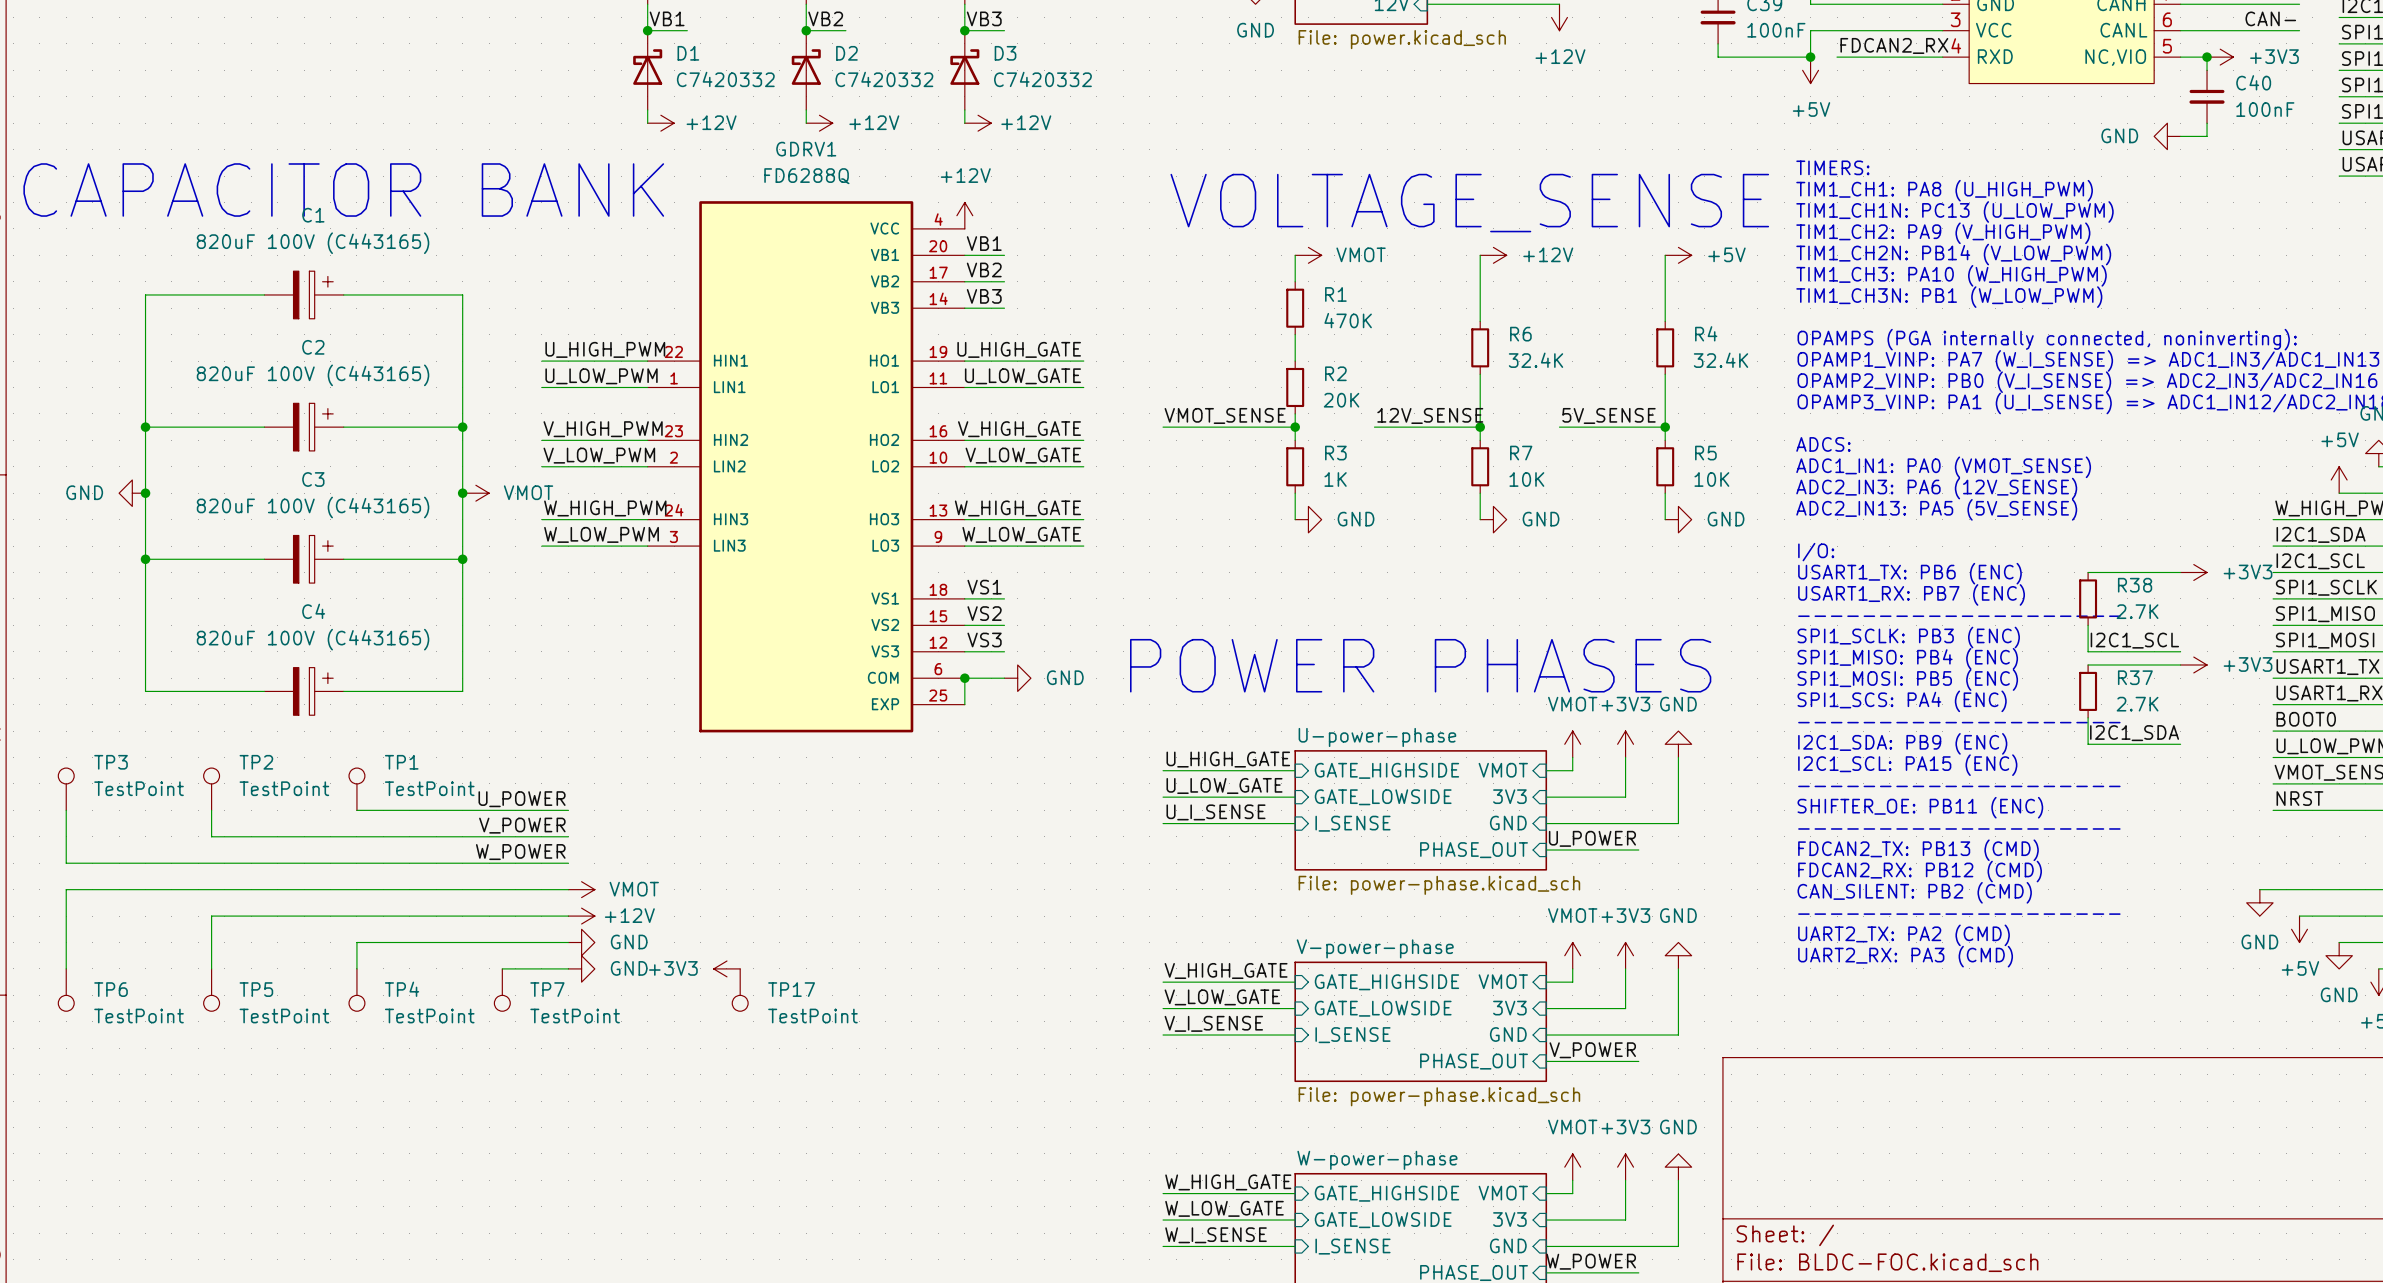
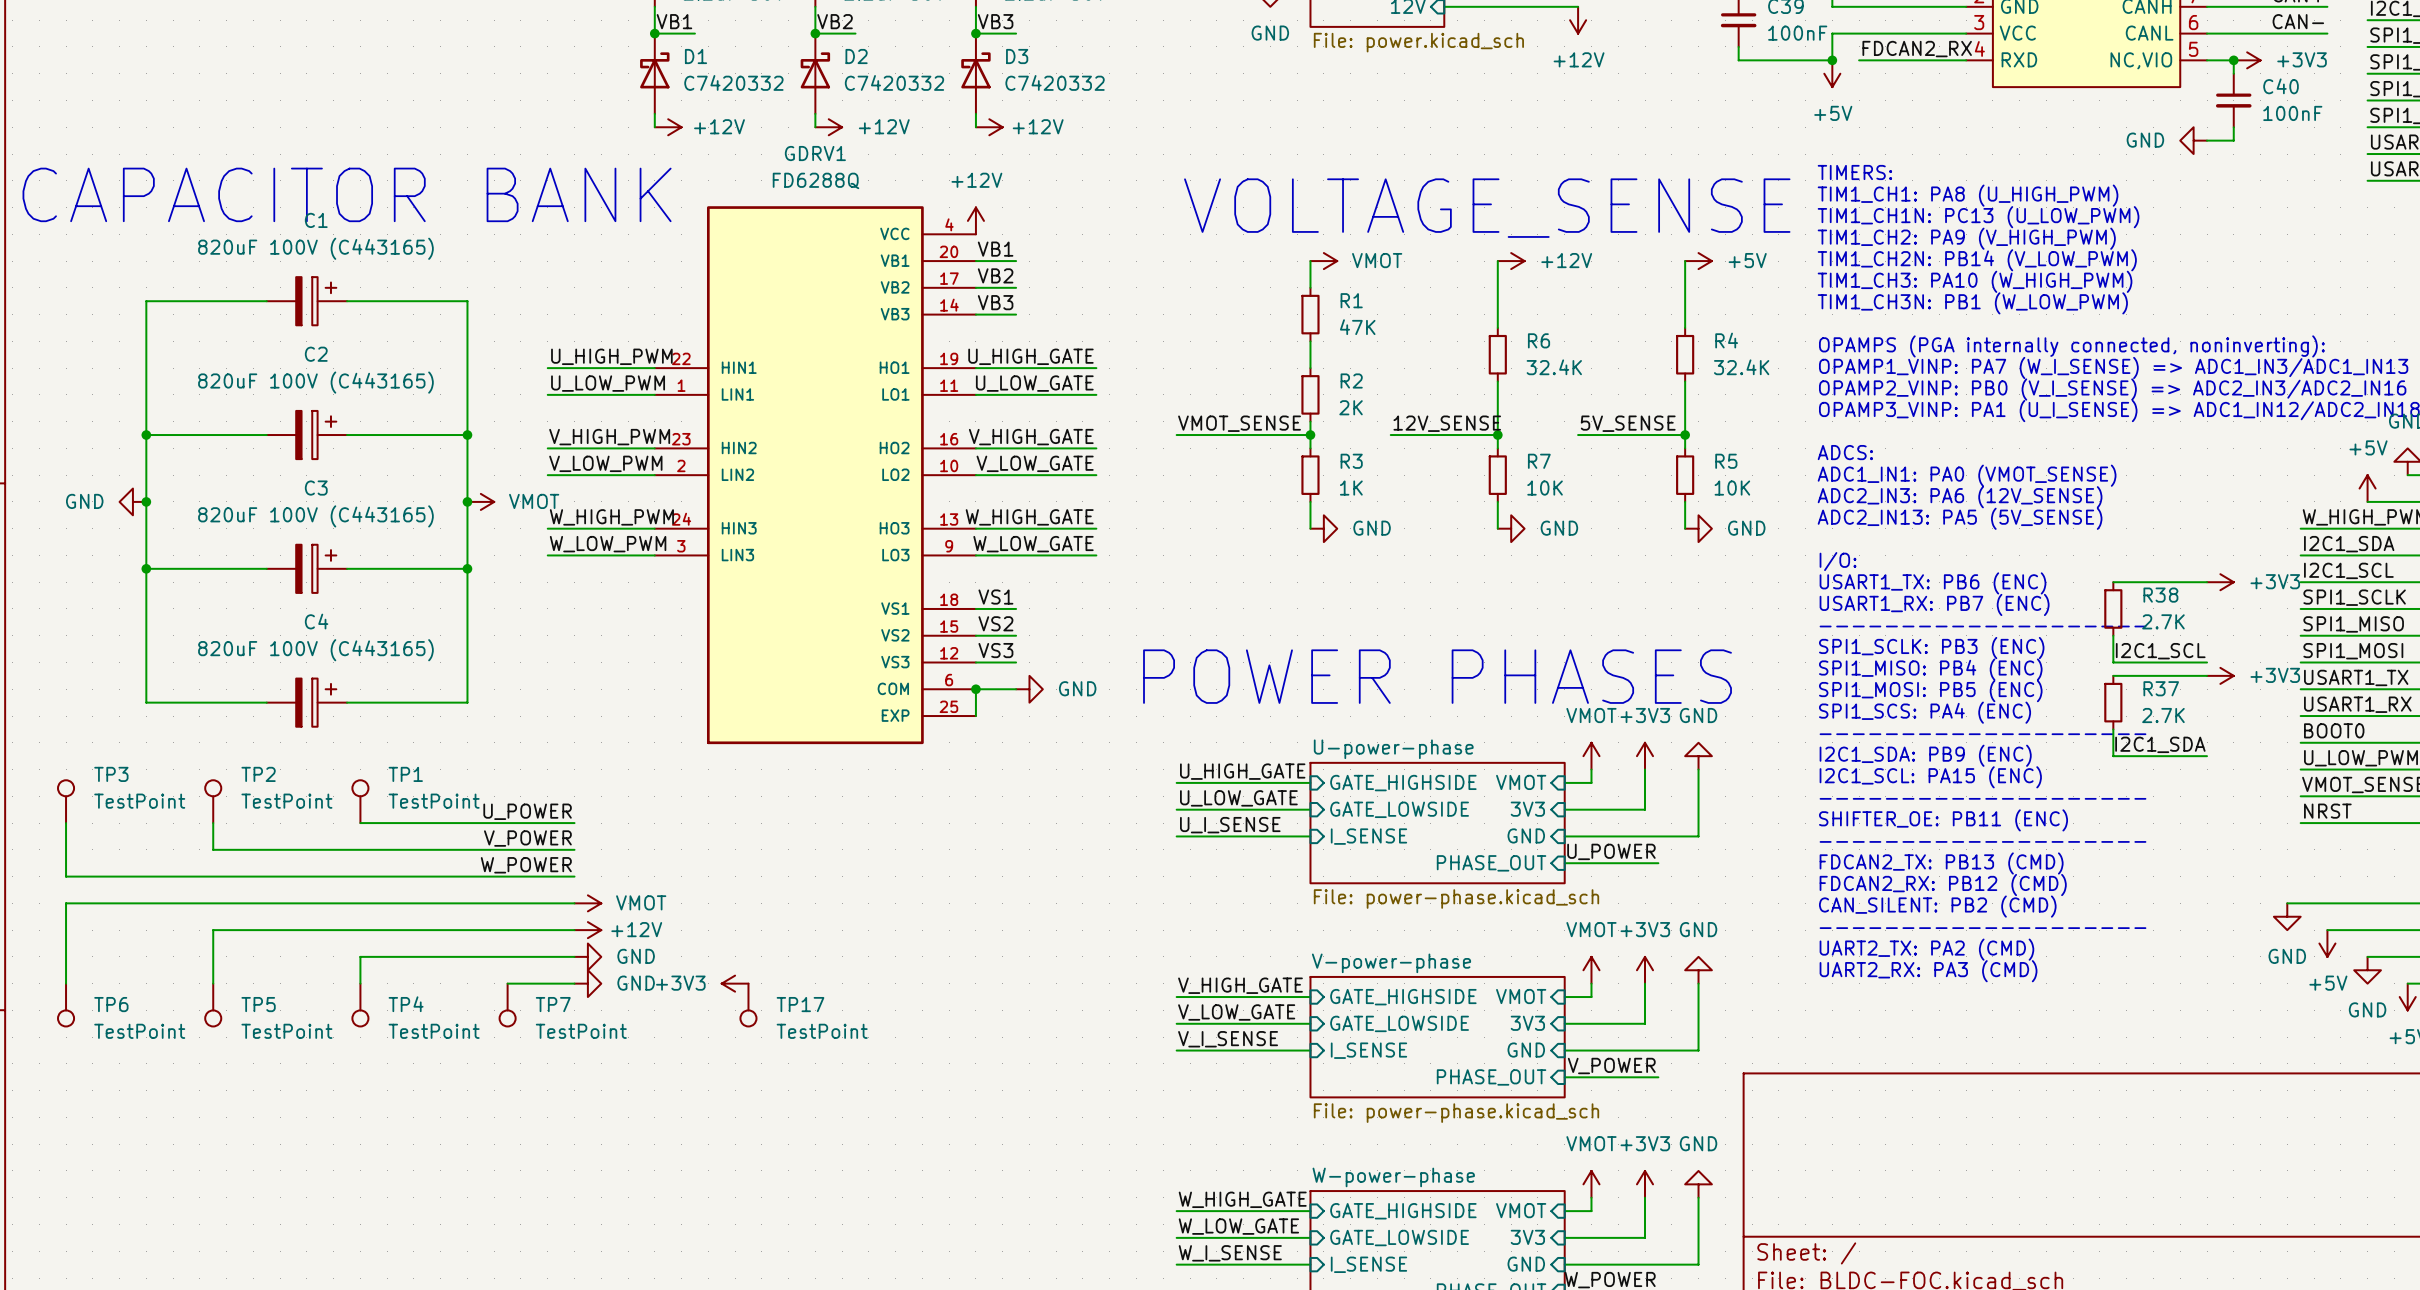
R1 value: 470K (1348, 320) -> 47K (1357, 327)
R2 value: 20K (1341, 400) -> 2K (1351, 407)

